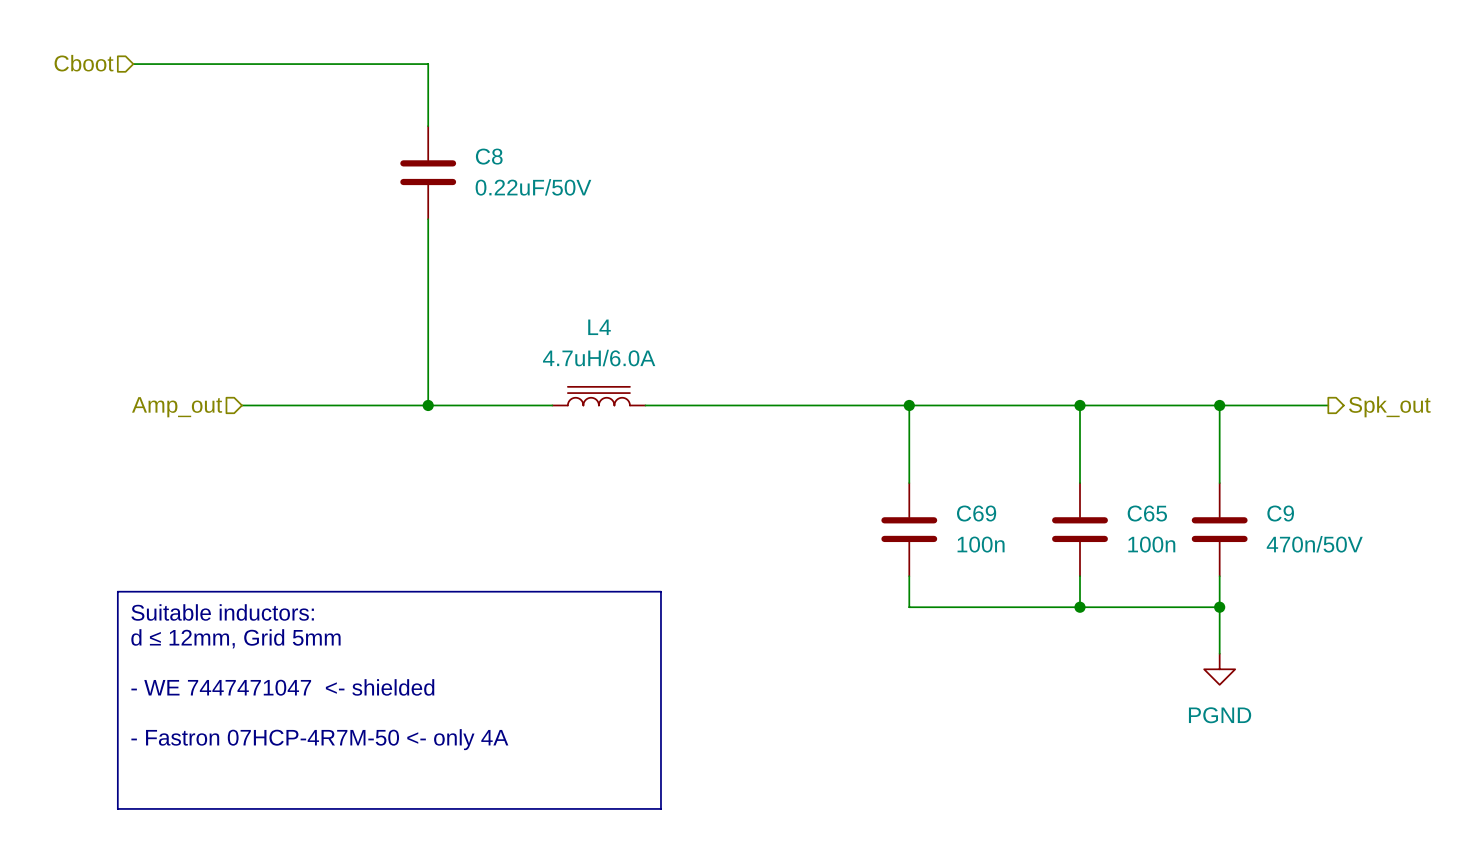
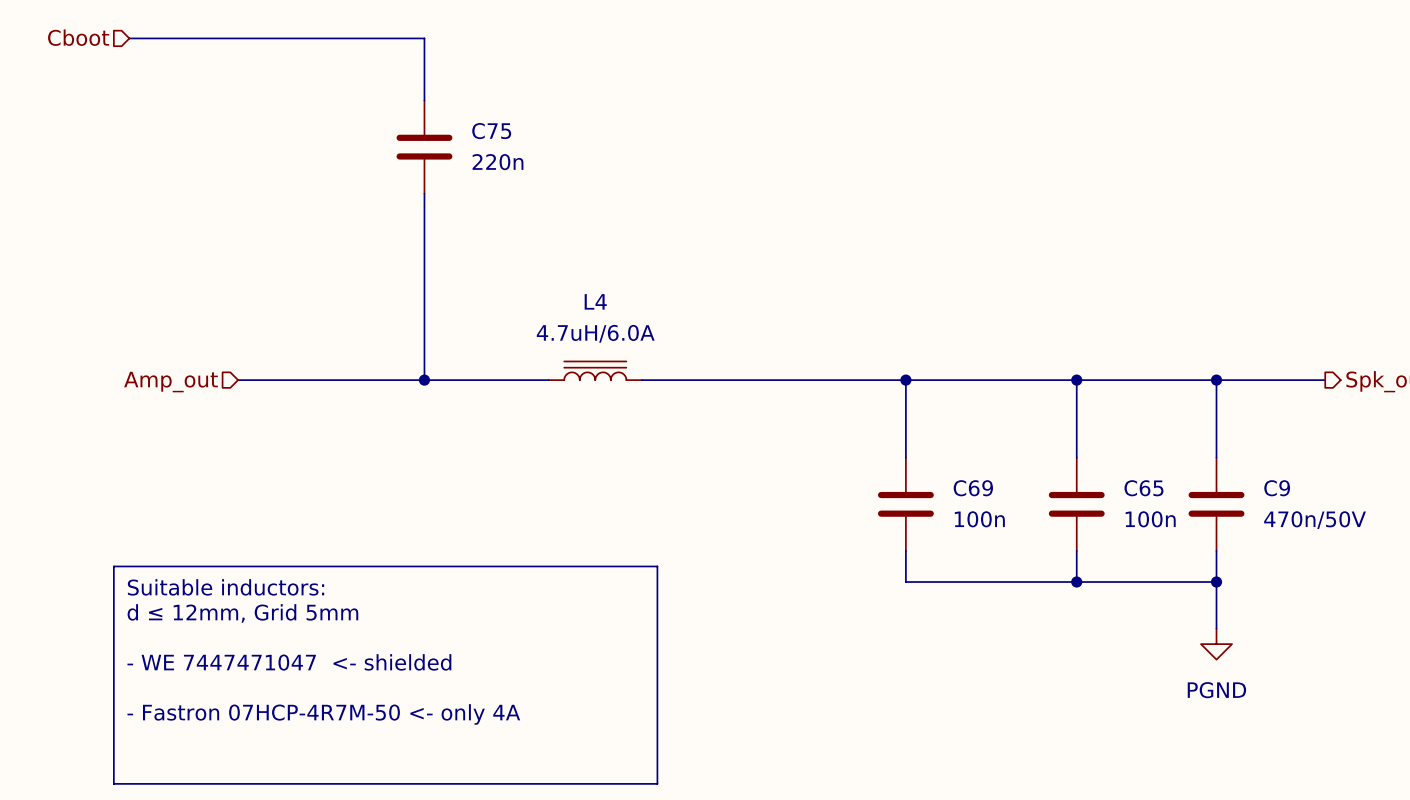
C8 name: C8 (489, 156) -> C75 (491, 131)
C8 value: 0.22uF/50V (533, 187) -> 220n (498, 162)

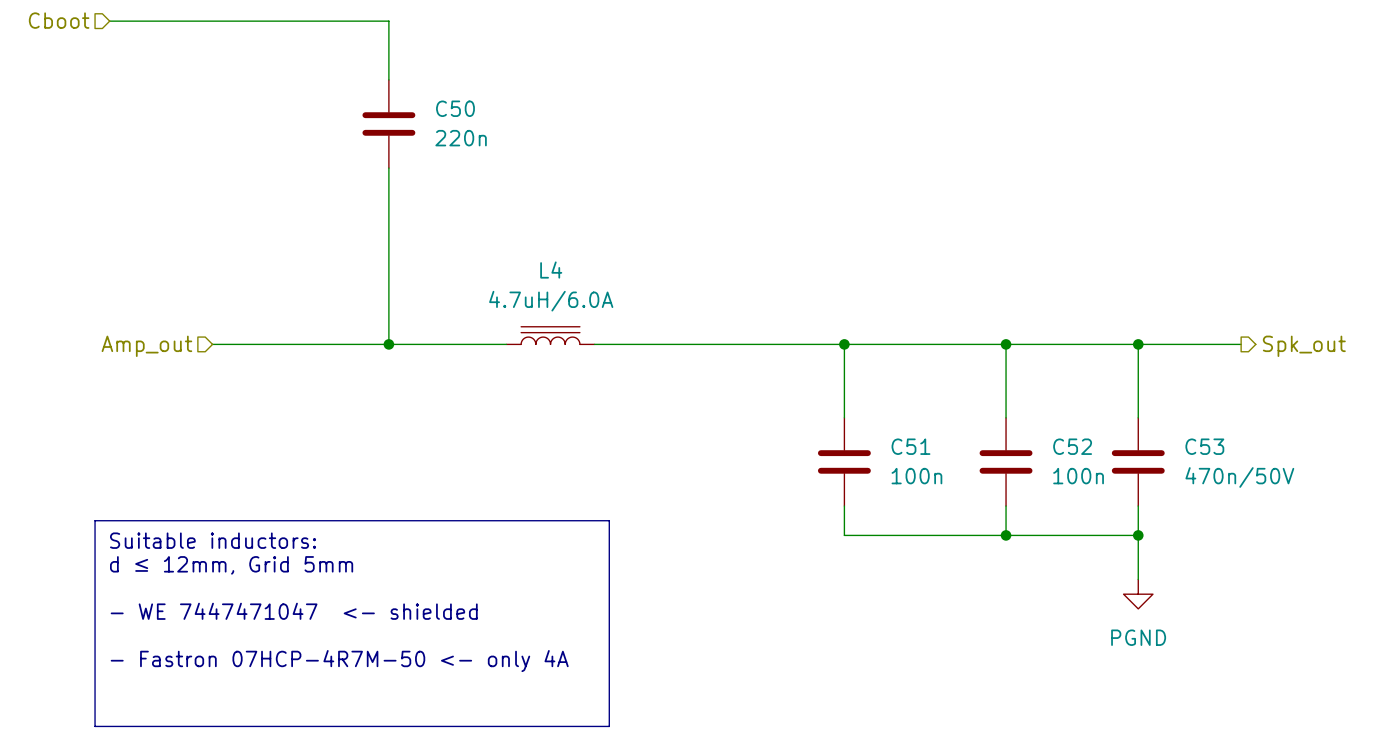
C75 name: C75 (491, 131) -> C50 (455, 108)
C69 name: C69 (973, 488) -> C51 (910, 446)
C65 name: C65 (1143, 488) -> C52 (1072, 446)
C9 name: C9 (1277, 488) -> C53 (1204, 446)

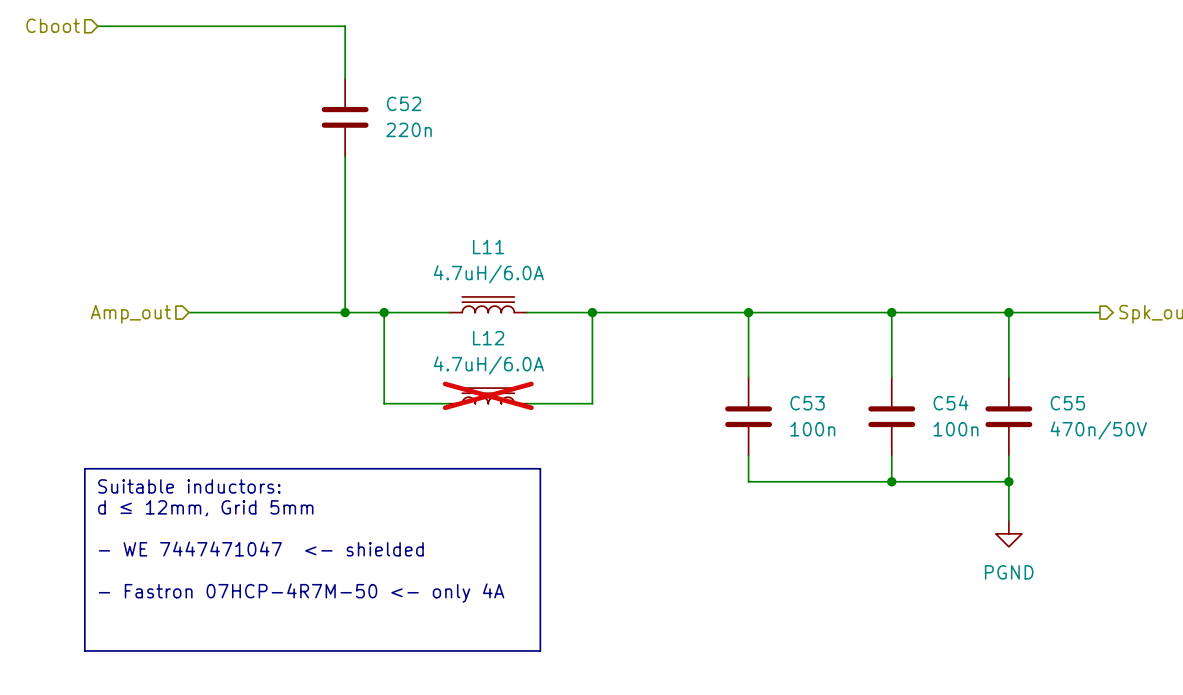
C50 name: C50 (455, 108) -> C52 (404, 103)
L4 name: L4 (551, 270) -> L11 (488, 247)
wire: none -> (384, 312) (384, 403) (449, 403)
junction: none -> (384, 312)
wire: none -> (592, 312) (592, 403) (527, 403)
junction: none -> (592, 312)
L12: none -> 4.7uH/6.0A (488, 395)
C51 name: C51 (910, 446) -> C53 (807, 403)
C52 name: C52 (1072, 446) -> C54 (951, 402)
C53 name: C53 (1204, 446) -> C55 (1067, 403)

